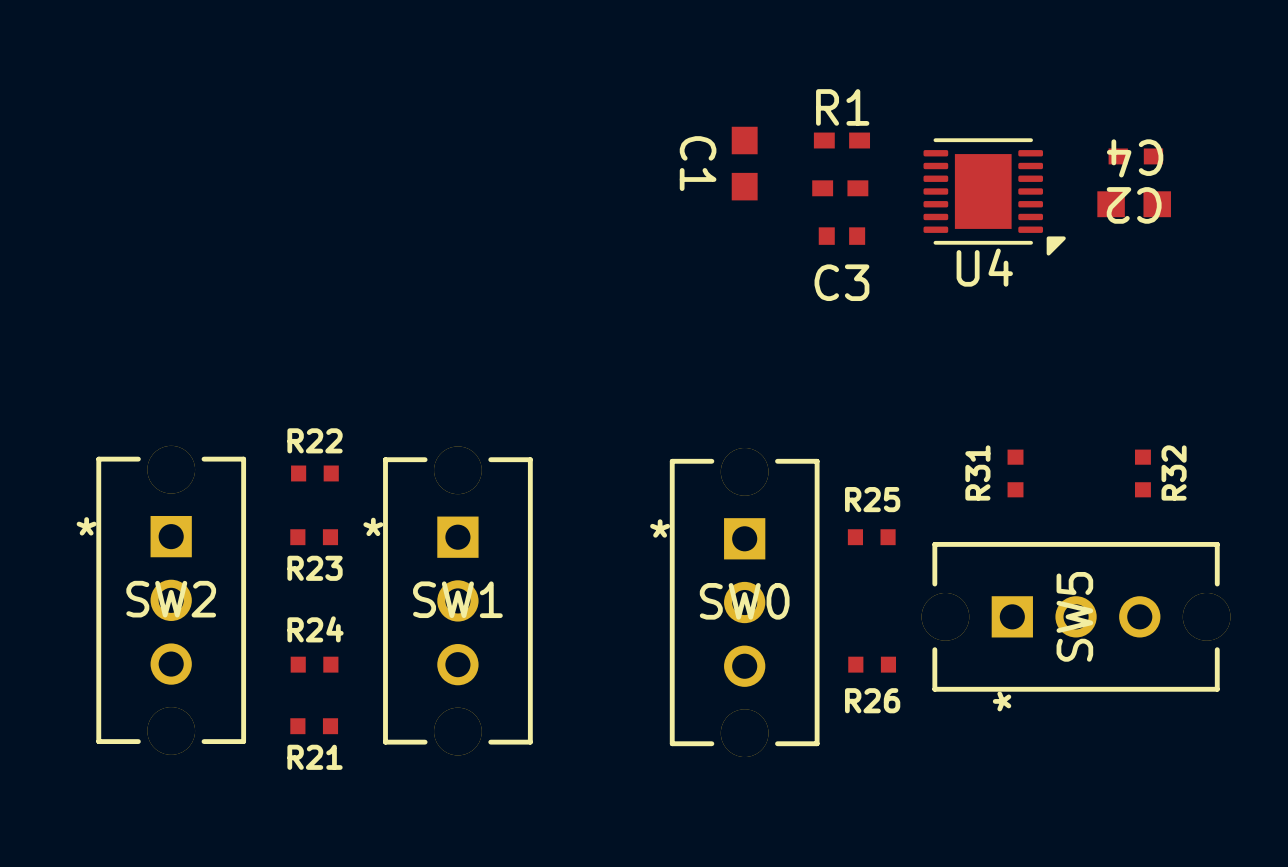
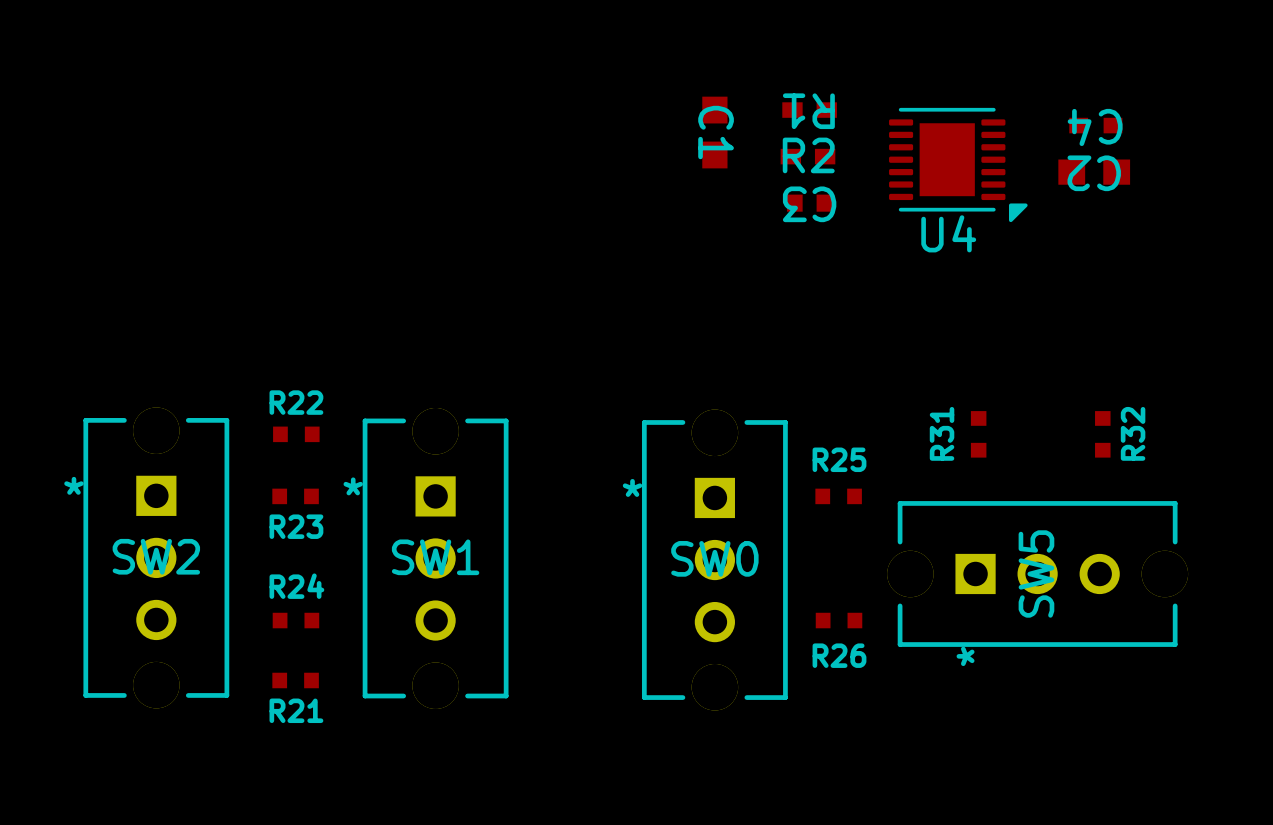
R1 name rotation: 0° (842, 107) -> 180° (808, 111)
C1 name position: C1 (698, 163) -> C1 (716, 132)
R2 name: none -> R2 (808, 155)
C3 name rotation: 0° (841, 282) -> 180° (809, 204)

